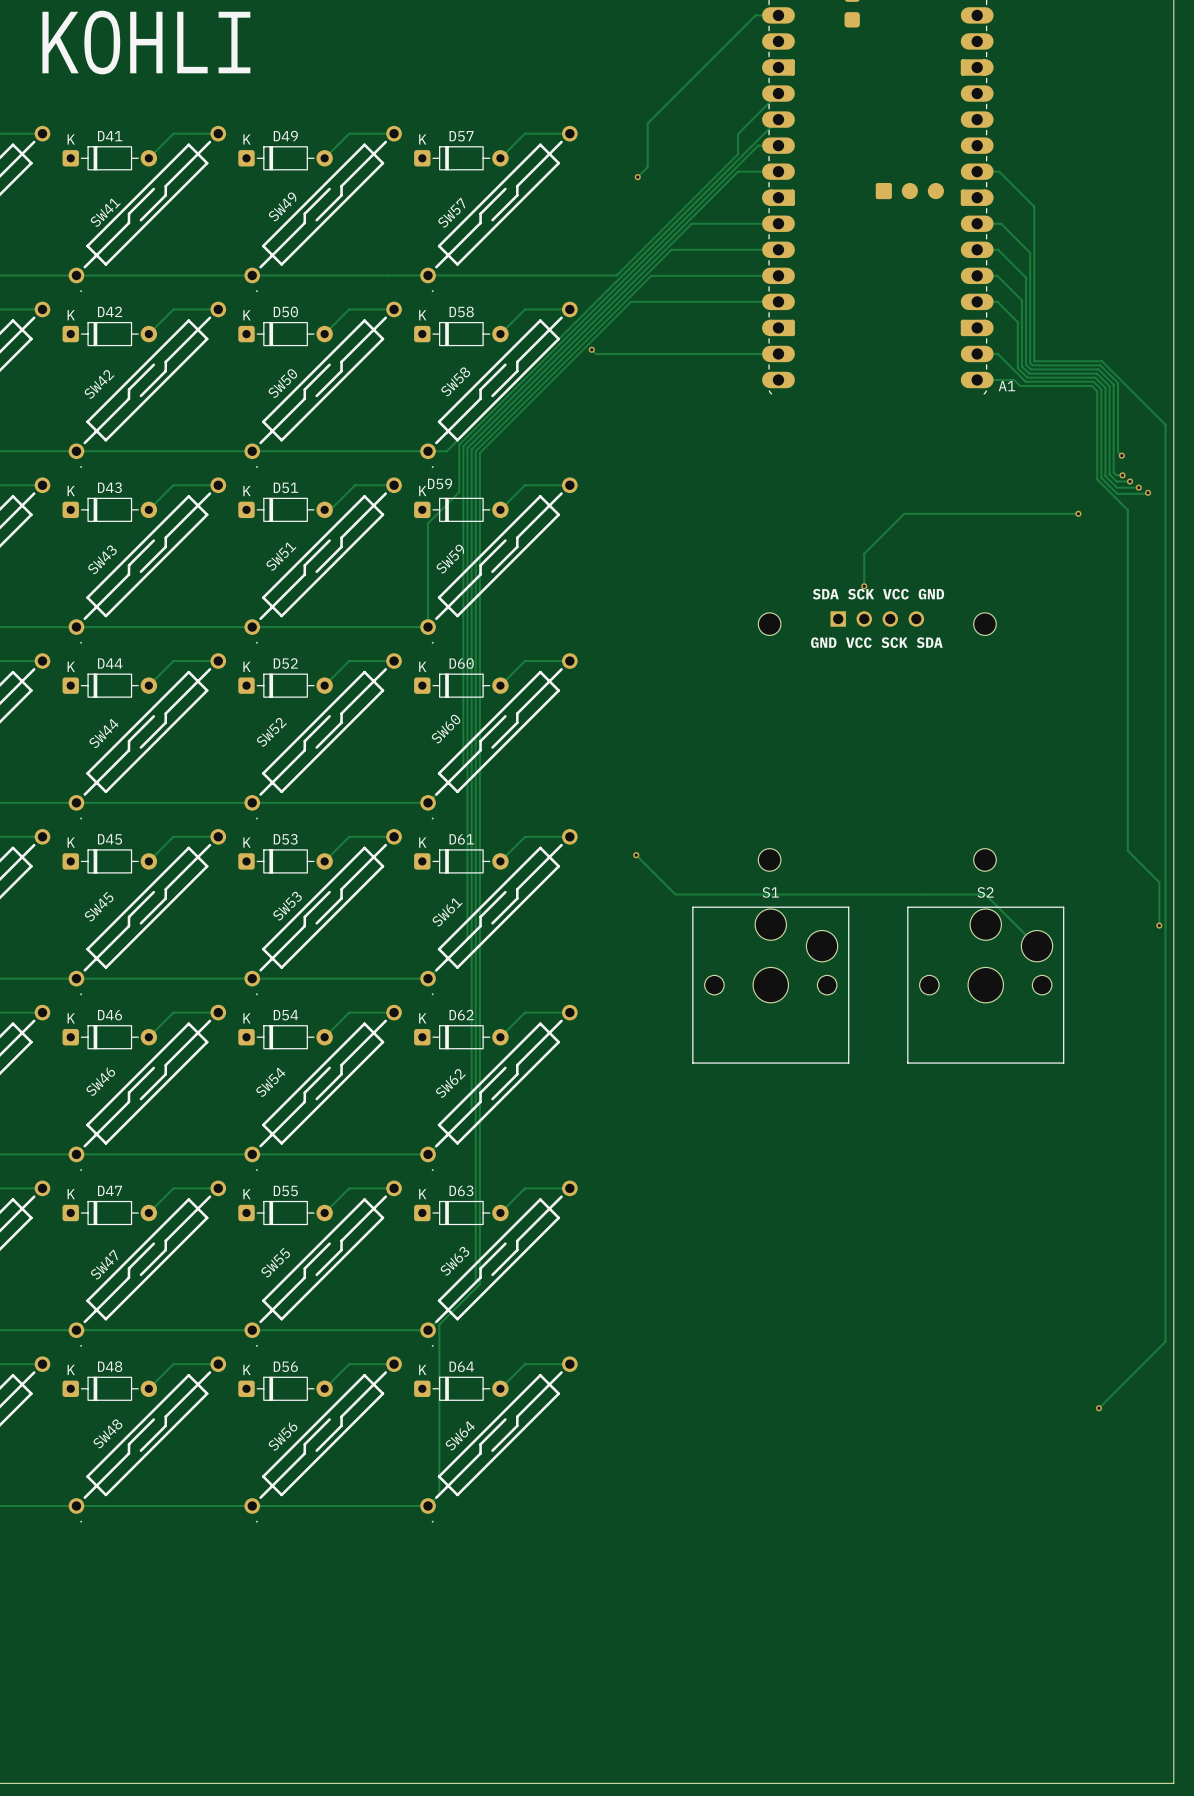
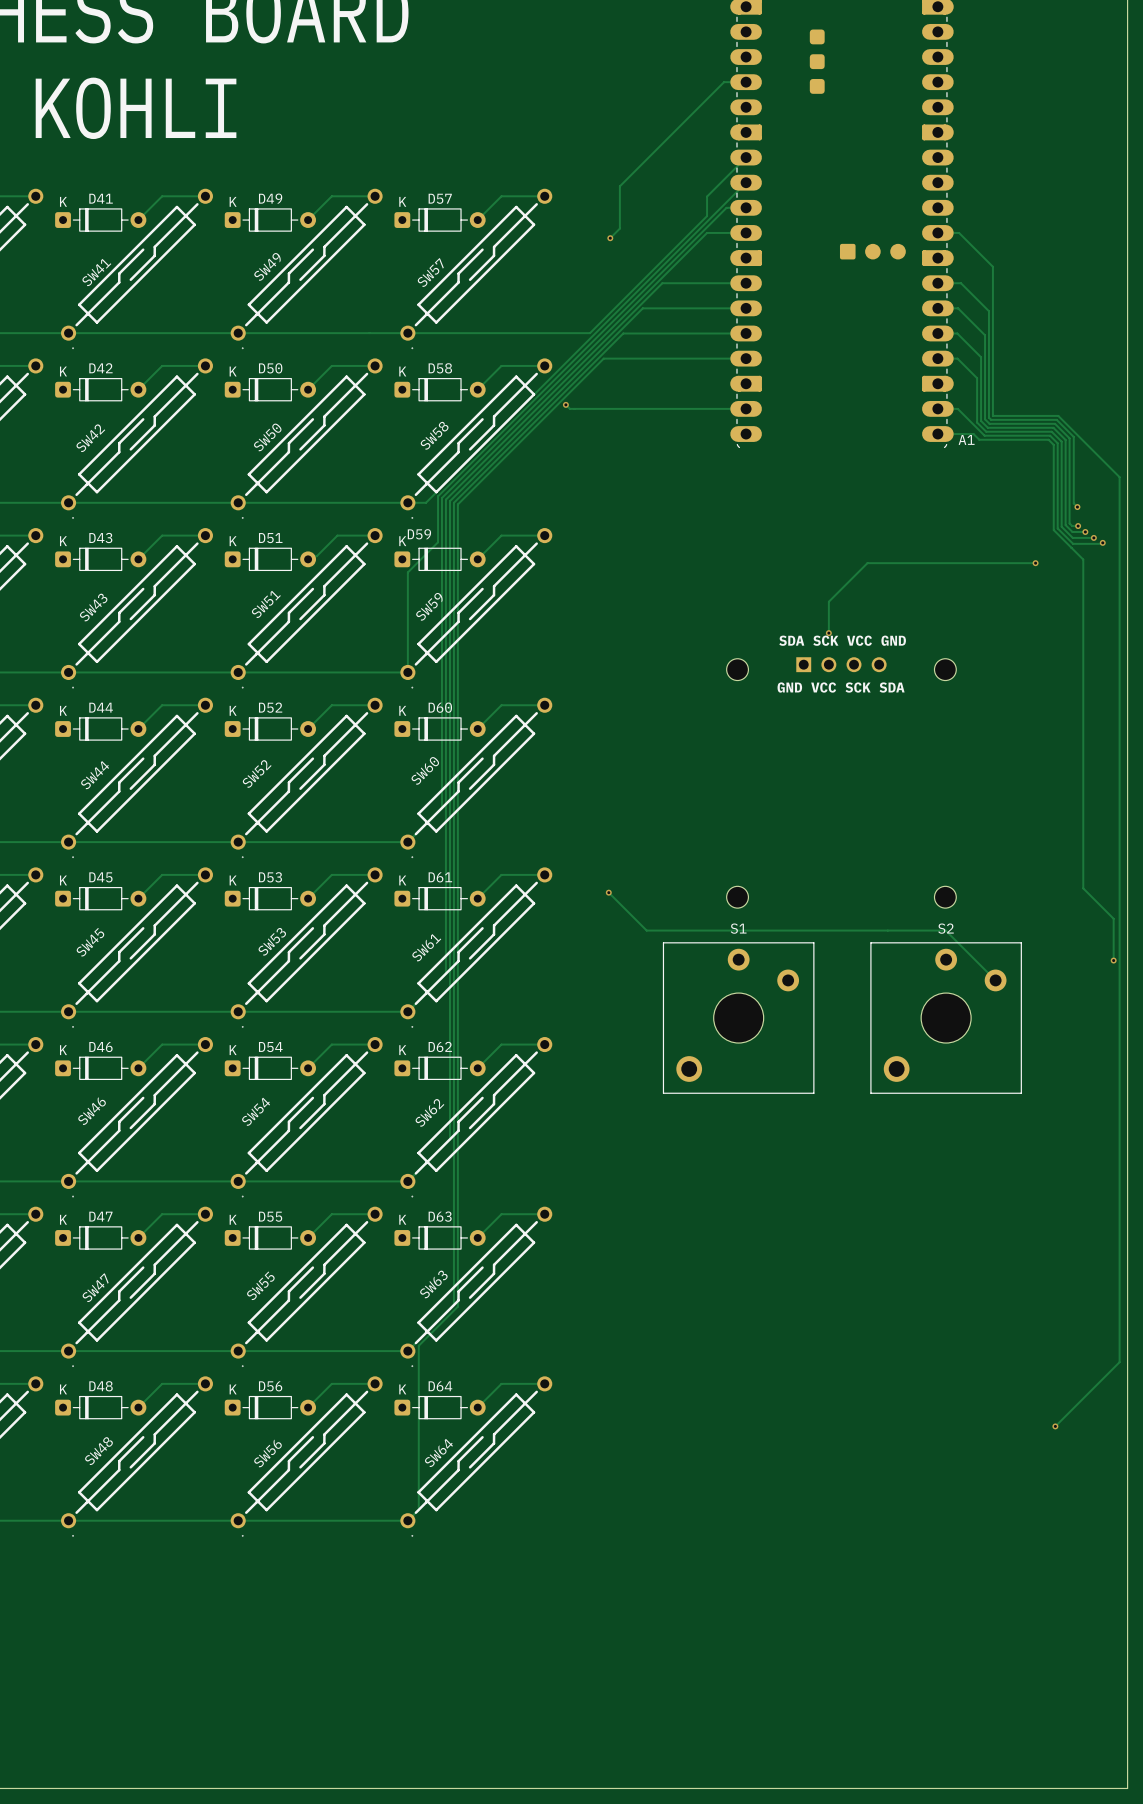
S1 footprint: [692, 906, 850, 1064] -> [662, 942, 815, 1094]
S2 footprint: [907, 906, 1065, 1064] -> [870, 942, 1022, 1094]

